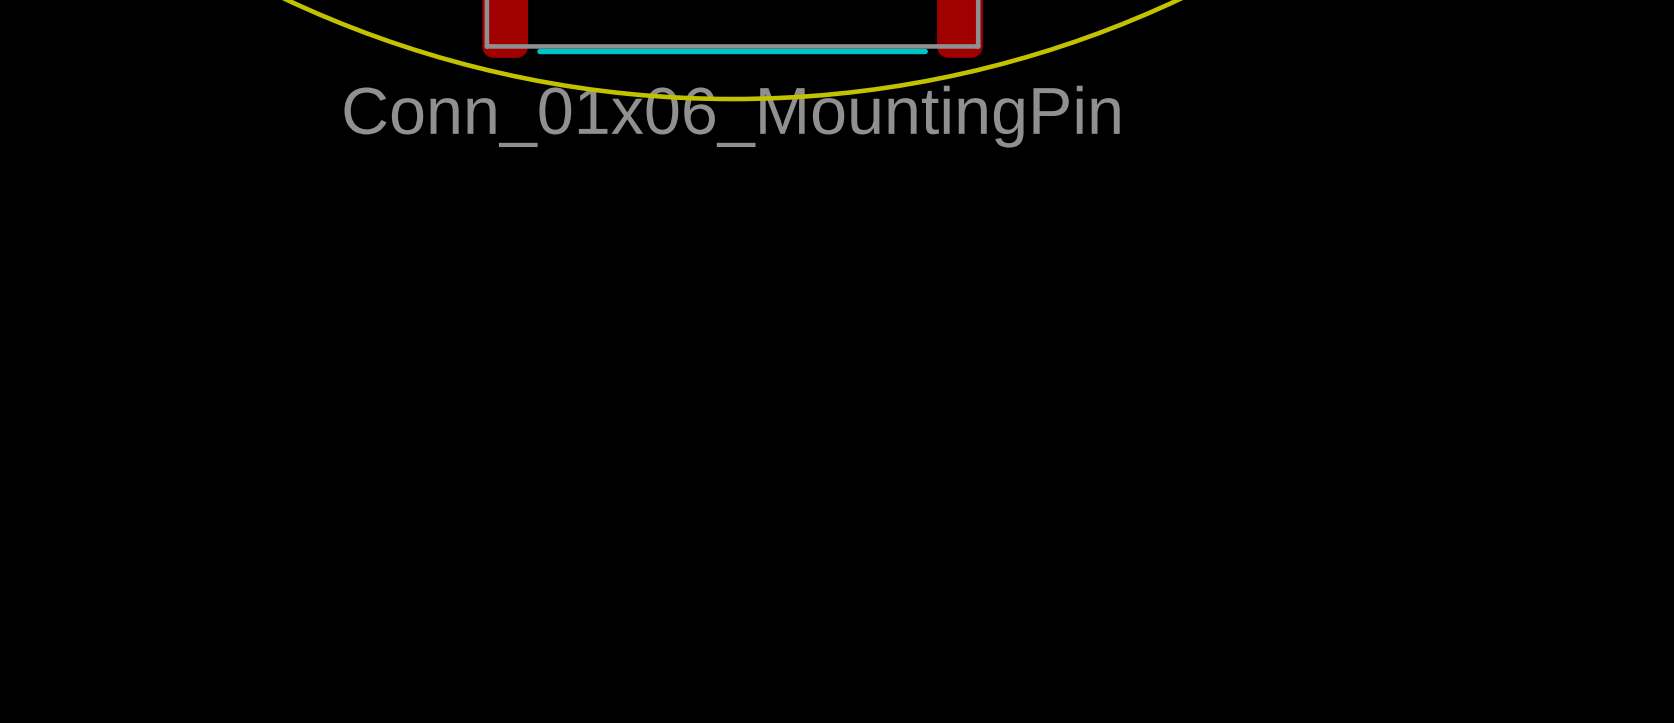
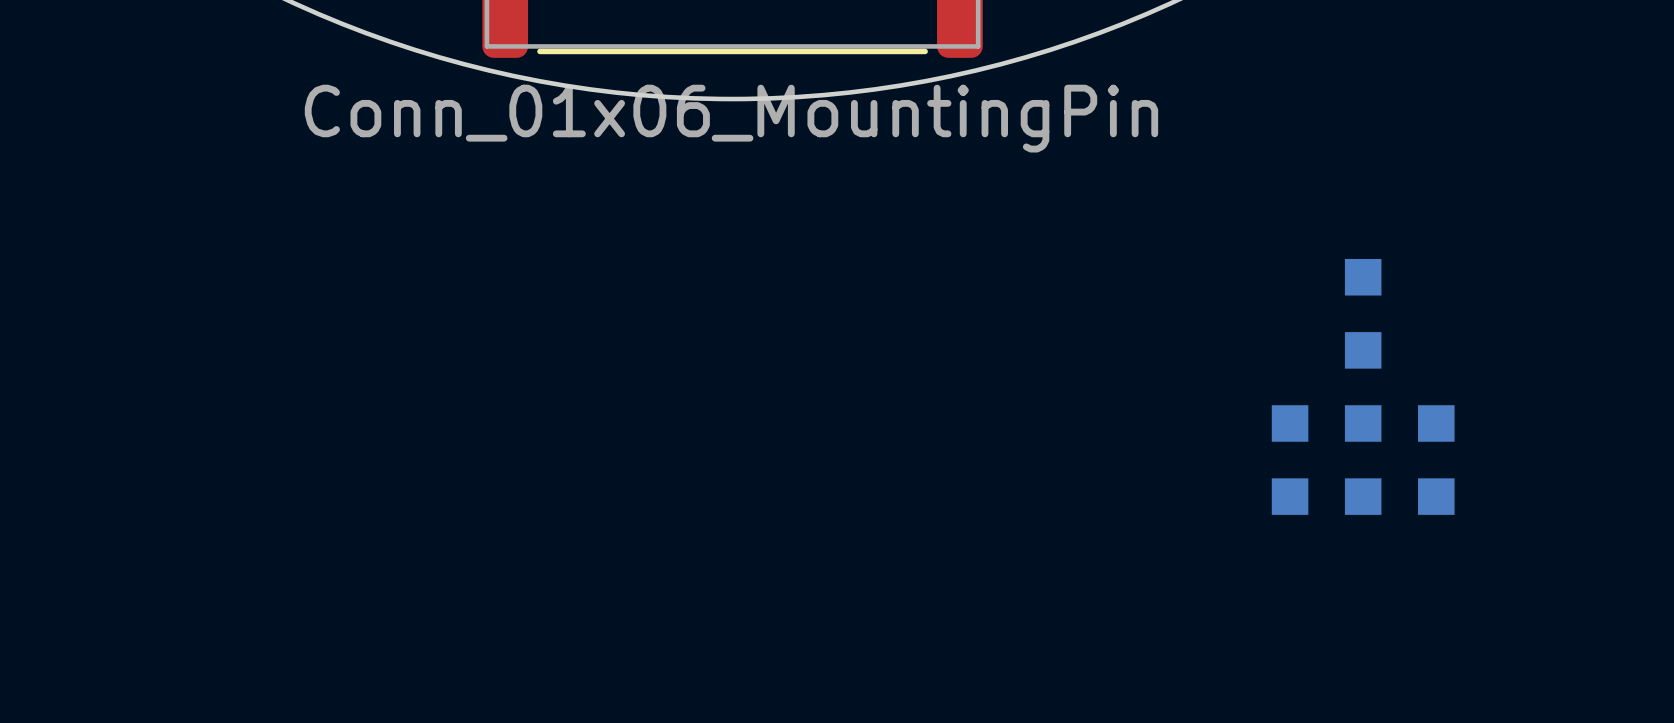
part: none -> (1363, 313)
part: none -> (1399, 423)
part: none -> (1290, 460)
part: none -> (1399, 496)

